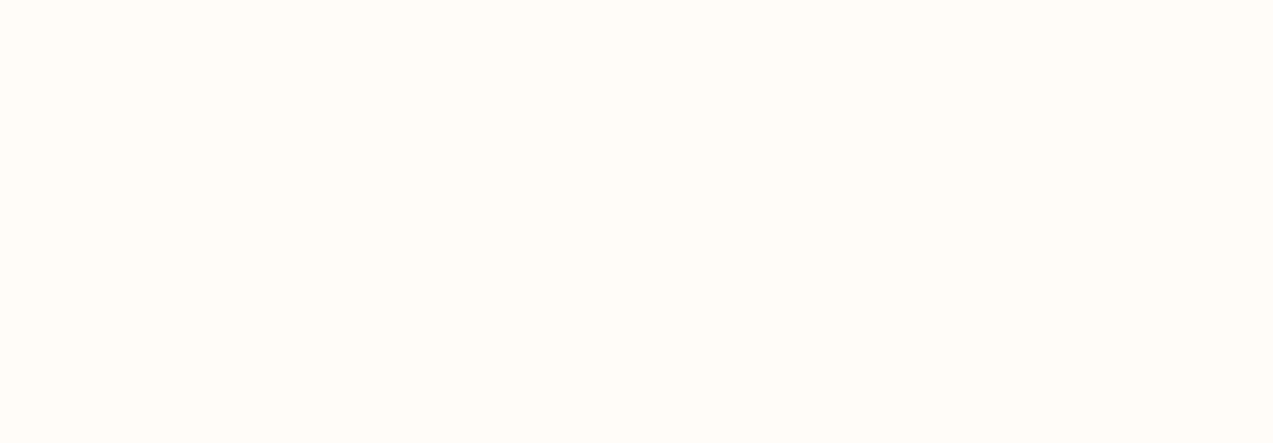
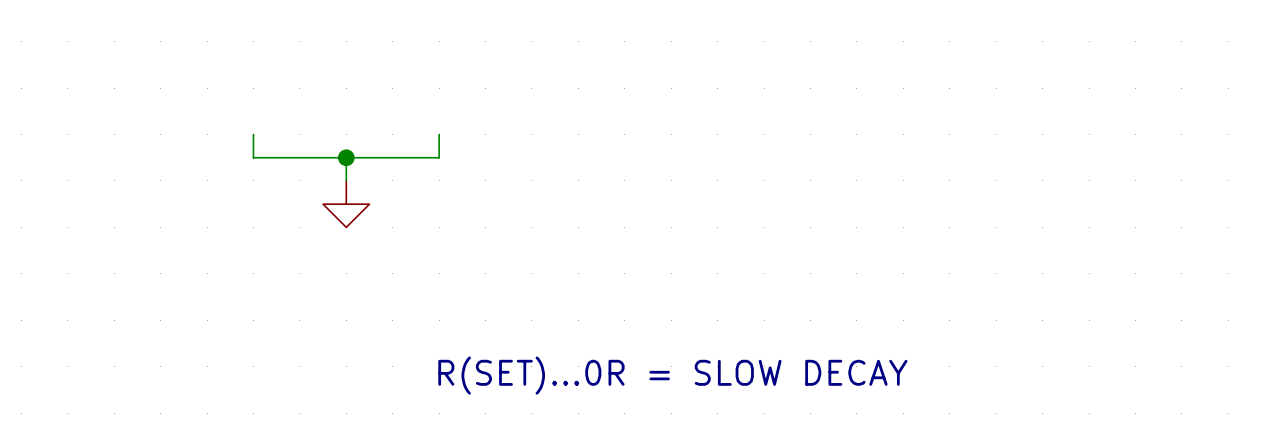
wire: none -> (253, 134) (253, 157) (439, 157) (439, 134)
wire: none -> (346, 157) (346, 180)
junction: none -> (346, 157)
power symbol: none -> (346, 204)
text: none -> R(SET)...0R = SLOW DECAY (672, 375)

